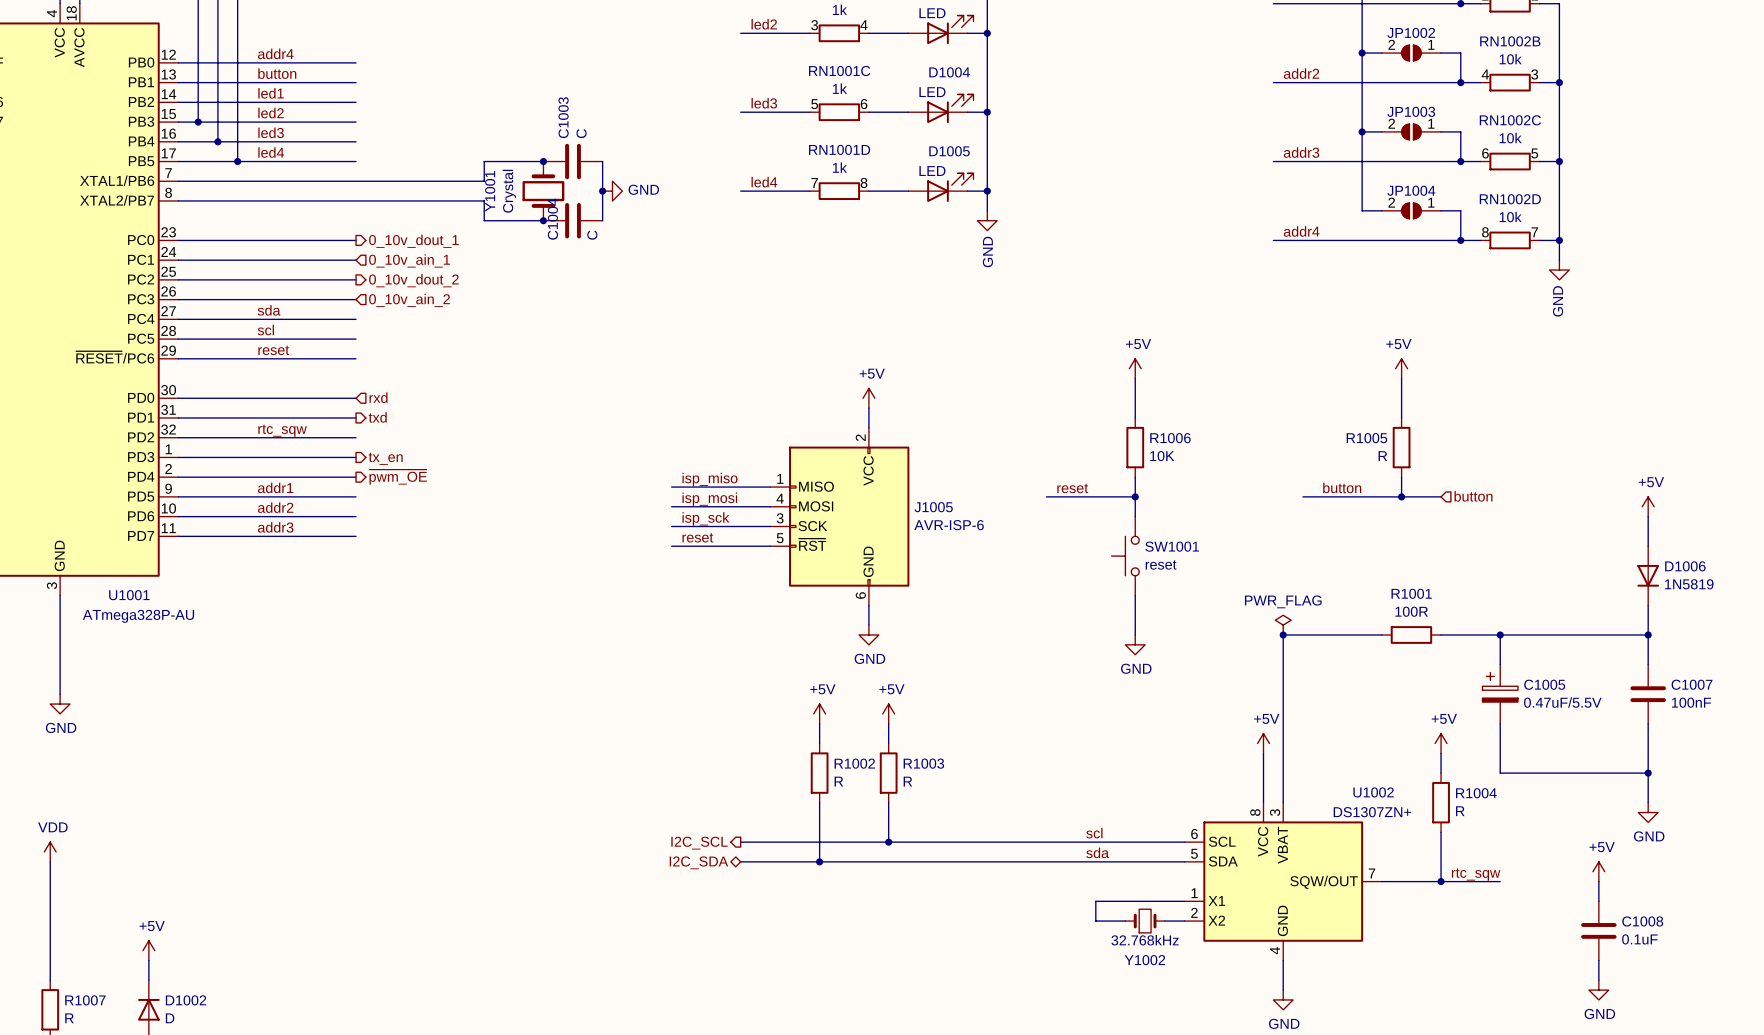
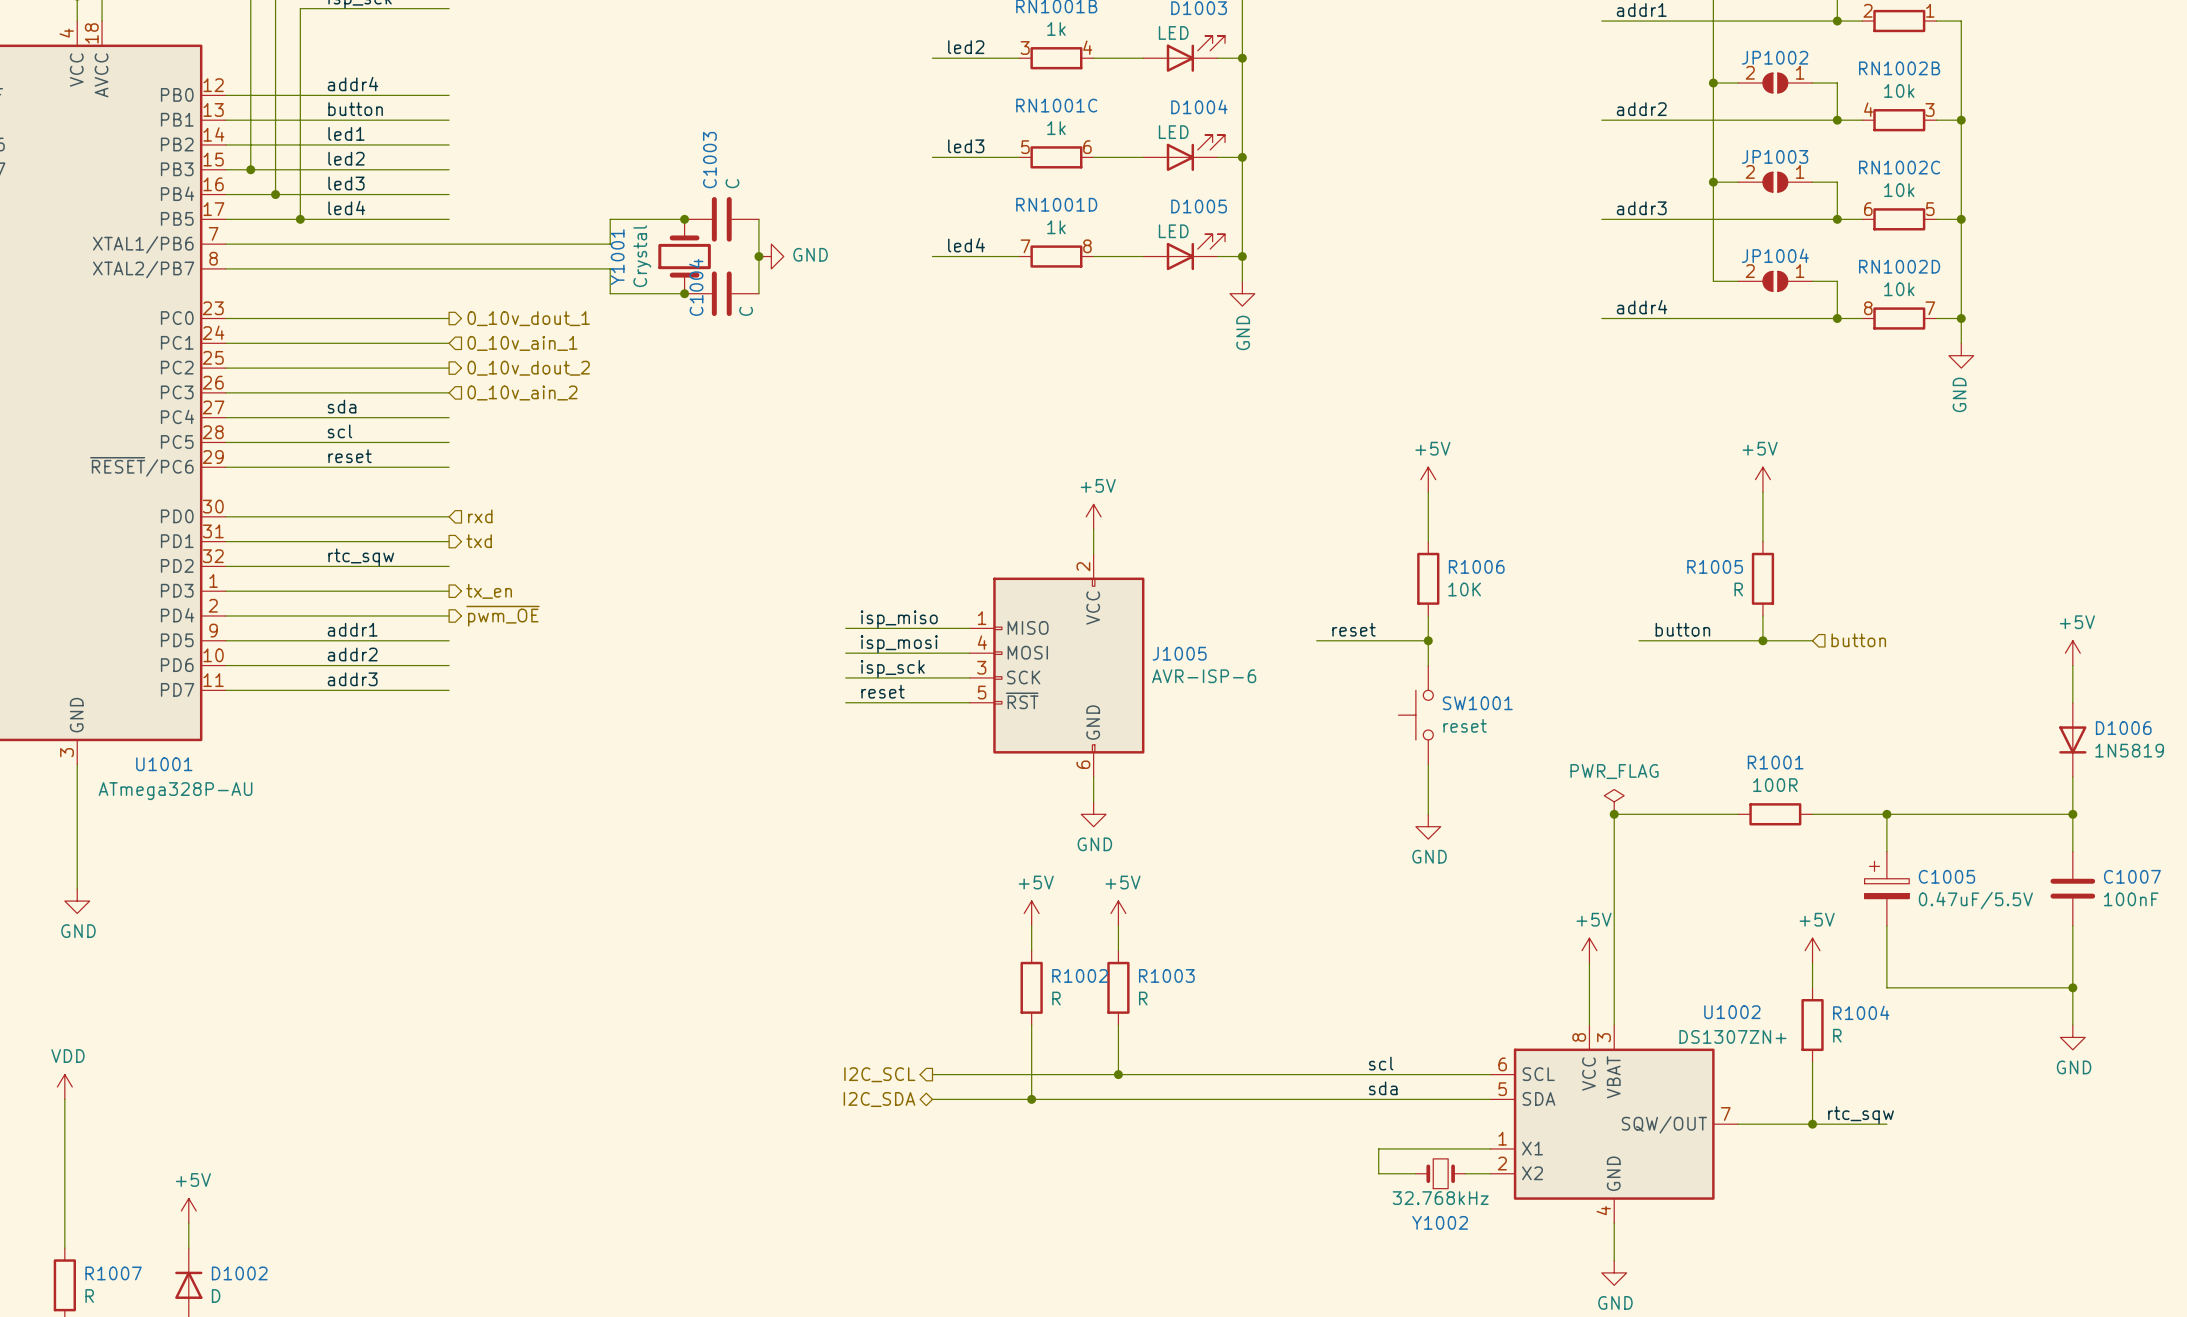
power symbol: +5V (1598, 871) -> none
wire: (1598, 881) (1598, 901) -> none
C1008: 0.1uF (1598, 930) -> none
wire: (1598, 960) (1598, 980) -> none
power symbol: GND (1598, 990) -> none

